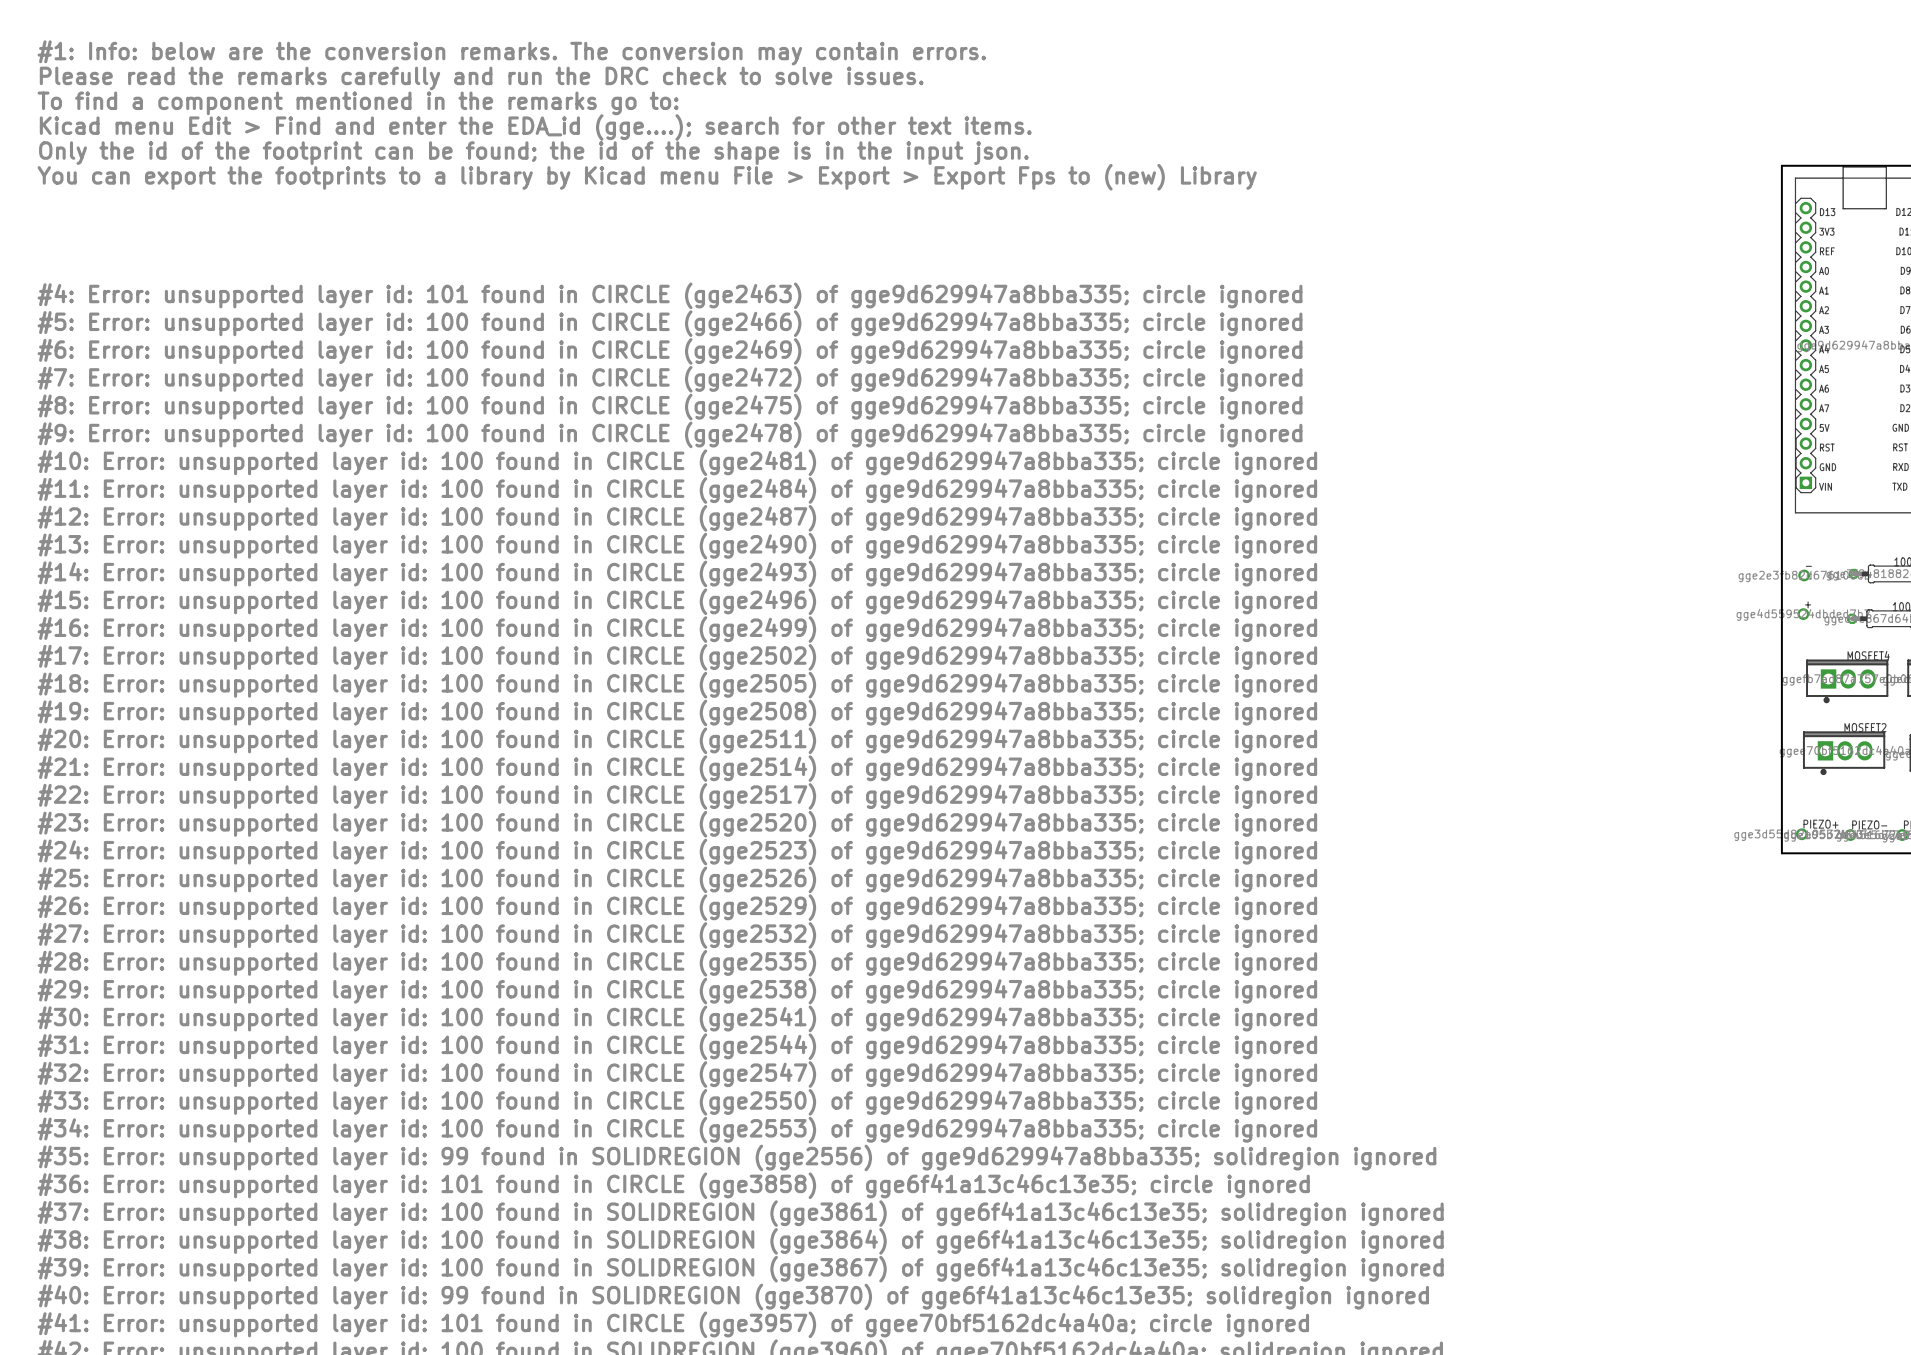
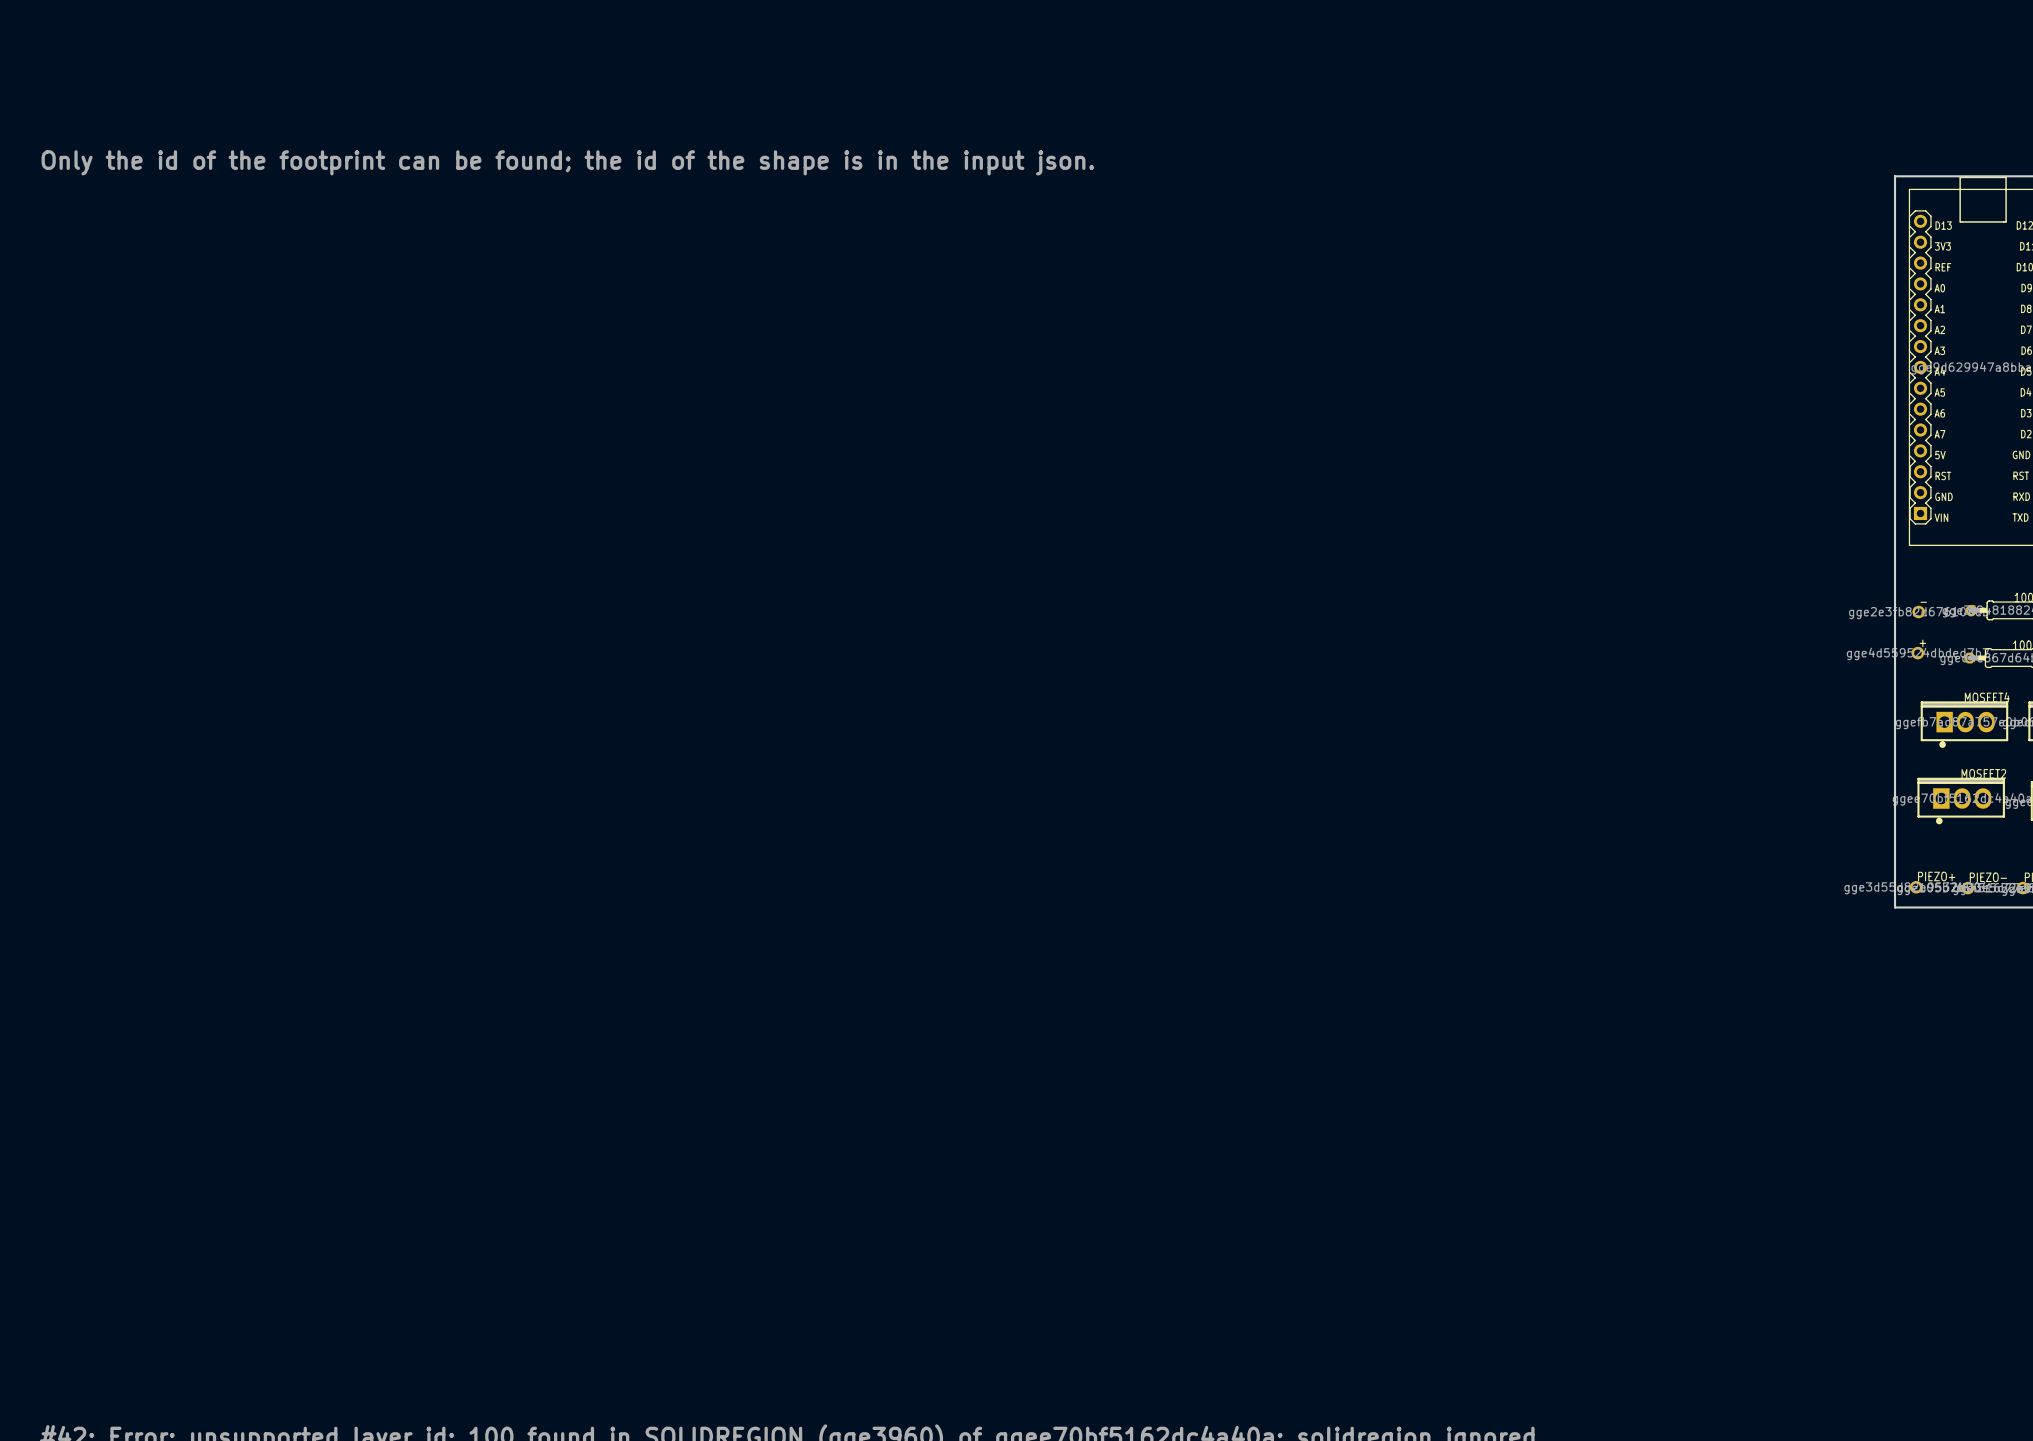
text: #1: Info: below are the conversion remarks. The conversion may contain errors. (511, 52) -> none
text: Please read the remarks carefully and run the DRC check to solve issues. (481, 78) -> none
text: To find a component mentioned in the remarks go to: (358, 103) -> none
text: Kicad menu Edit > Find and enter the EDA_id (gge....); search for other text items. (535, 127) -> none
text: You can export the footprints to a library by Kicad menu File > Export > Export Fps to (new) Library (647, 177) -> none
text: #4: Error: unsupported layer id: 101 found in CIRCLE (gge2463) of gge9d629947a8bba335; circle ignored (670, 295) -> none
text: #5: Error: unsupported layer id: 100 found in CIRCLE (gge2466) of gge9d629947a8bba335; circle ignored (670, 323) -> none
text: #6: Error: unsupported layer id: 100 found in CIRCLE (gge2469) of gge9d629947a8bba335; circle ignored (670, 351) -> none
text: #7: Error: unsupported layer id: 100 found in CIRCLE (gge2472) of gge9d629947a8bba335; circle ignored (670, 379) -> none
text: #8: Error: unsupported layer id: 100 found in CIRCLE (gge2475) of gge9d629947a8bba335; circle ignored (670, 407) -> none
text: #9: Error: unsupported layer id: 100 found in CIRCLE (gge2478) of gge9d629947a8bba335; circle ignored (670, 434) -> none
text: #10: Error: unsupported layer id: 100 found in CIRCLE (gge2481) of gge9d629947a8bba335; circle ignored (677, 462) -> none
text: #11: Error: unsupported layer id: 100 found in CIRCLE (gge2484) of gge9d629947a8bba335; circle ignored (677, 490) -> none
text: #12: Error: unsupported layer id: 100 found in CIRCLE (gge2487) of gge9d629947a8bba335; circle ignored (677, 518) -> none
text: #13: Error: unsupported layer id: 100 found in CIRCLE (gge2490) of gge9d629947a8bba335; circle ignored (677, 546) -> none
text: #14: Error: unsupported layer id: 100 found in CIRCLE (gge2493) of gge9d629947a8bba335; circle ignored (677, 573) -> none
text: #15: Error: unsupported layer id: 100 found in CIRCLE (gge2496) of gge9d629947a8bba335; circle ignored (677, 601) -> none
text: #16: Error: unsupported layer id: 100 found in CIRCLE (gge2499) of gge9d629947a8bba335; circle ignored (677, 629) -> none
text: #17: Error: unsupported layer id: 100 found in CIRCLE (gge2502) of gge9d629947a8bba335; circle ignored (677, 657) -> none
text: #18: Error: unsupported layer id: 100 found in CIRCLE (gge2505) of gge9d629947a8bba335; circle ignored (677, 685) -> none
text: #19: Error: unsupported layer id: 100 found in CIRCLE (gge2508) of gge9d629947a8bba335; circle ignored (677, 712) -> none
text: #20: Error: unsupported layer id: 100 found in CIRCLE (gge2511) of gge9d629947a8bba335; circle ignored (677, 740) -> none
text: #21: Error: unsupported layer id: 100 found in CIRCLE (gge2514) of gge9d629947a8bba335; circle ignored (677, 768) -> none
text: #22: Error: unsupported layer id: 100 found in CIRCLE (gge2517) of gge9d629947a8bba335; circle ignored (677, 796) -> none
text: #23: Error: unsupported layer id: 100 found in CIRCLE (gge2520) of gge9d629947a8bba335; circle ignored (677, 824) -> none
text: #24: Error: unsupported layer id: 100 found in CIRCLE (gge2523) of gge9d629947a8bba335; circle ignored (677, 852) -> none
text: #25: Error: unsupported layer id: 100 found in CIRCLE (gge2526) of gge9d629947a8bba335; circle ignored (677, 879) -> none
text: #26: Error: unsupported layer id: 100 found in CIRCLE (gge2529) of gge9d629947a8bba335; circle ignored (677, 907) -> none
text: #27: Error: unsupported layer id: 100 found in CIRCLE (gge2532) of gge9d629947a8bba335; circle ignored (677, 935) -> none
text: #28: Error: unsupported layer id: 100 found in CIRCLE (gge2535) of gge9d629947a8bba335; circle ignored (677, 963) -> none
text: #29: Error: unsupported layer id: 100 found in CIRCLE (gge2538) of gge9d629947a8bba335; circle ignored (677, 991) -> none
text: #30: Error: unsupported layer id: 100 found in CIRCLE (gge2541) of gge9d629947a8bba335; circle ignored (677, 1018) -> none
text: #31: Error: unsupported layer id: 100 found in CIRCLE (gge2544) of gge9d629947a8bba335; circle ignored (677, 1046) -> none
text: #32: Error: unsupported layer id: 100 found in CIRCLE (gge2547) of gge9d629947a8bba335; circle ignored (677, 1074) -> none
text: #33: Error: unsupported layer id: 100 found in CIRCLE (gge2550) of gge9d629947a8bba335; circle ignored (677, 1102) -> none
text: #34: Error: unsupported layer id: 100 found in CIRCLE (gge2553) of gge9d629947a8bba335; circle ignored (677, 1130) -> none
text: #35: Error: unsupported layer id: 99 found in SOLIDREGION (gge2556) of gge9d629947a8bba335; solidregion ignored (736, 1157) -> none
text: #36: Error: unsupported layer id: 101 found in CIRCLE (gge3858) of gge6f41a13c46c13e35; circle ignored (673, 1185) -> none
text: #37: Error: unsupported layer id: 100 found in SOLIDREGION (gge3861) of gge6f41a13c46c13e35; solidregion ignored (740, 1213) -> none
text: #38: Error: unsupported layer id: 100 found in SOLIDREGION (gge3864) of gge6f41a13c46c13e35; solidregion ignored (740, 1241) -> none
text: #39: Error: unsupported layer id: 100 found in SOLIDREGION (gge3867) of gge6f41a13c46c13e35; solidregion ignored (740, 1269) -> none
text: #40: Error: unsupported layer id: 99 found in SOLIDREGION (gge3870) of gge6f41a13c46c13e35; solidregion ignored (733, 1296) -> none
text: #41: Error: unsupported layer id: 101 found in CIRCLE (gge3957) of ggee70bf5162dc4a40a; circle ignored (673, 1324) -> none

